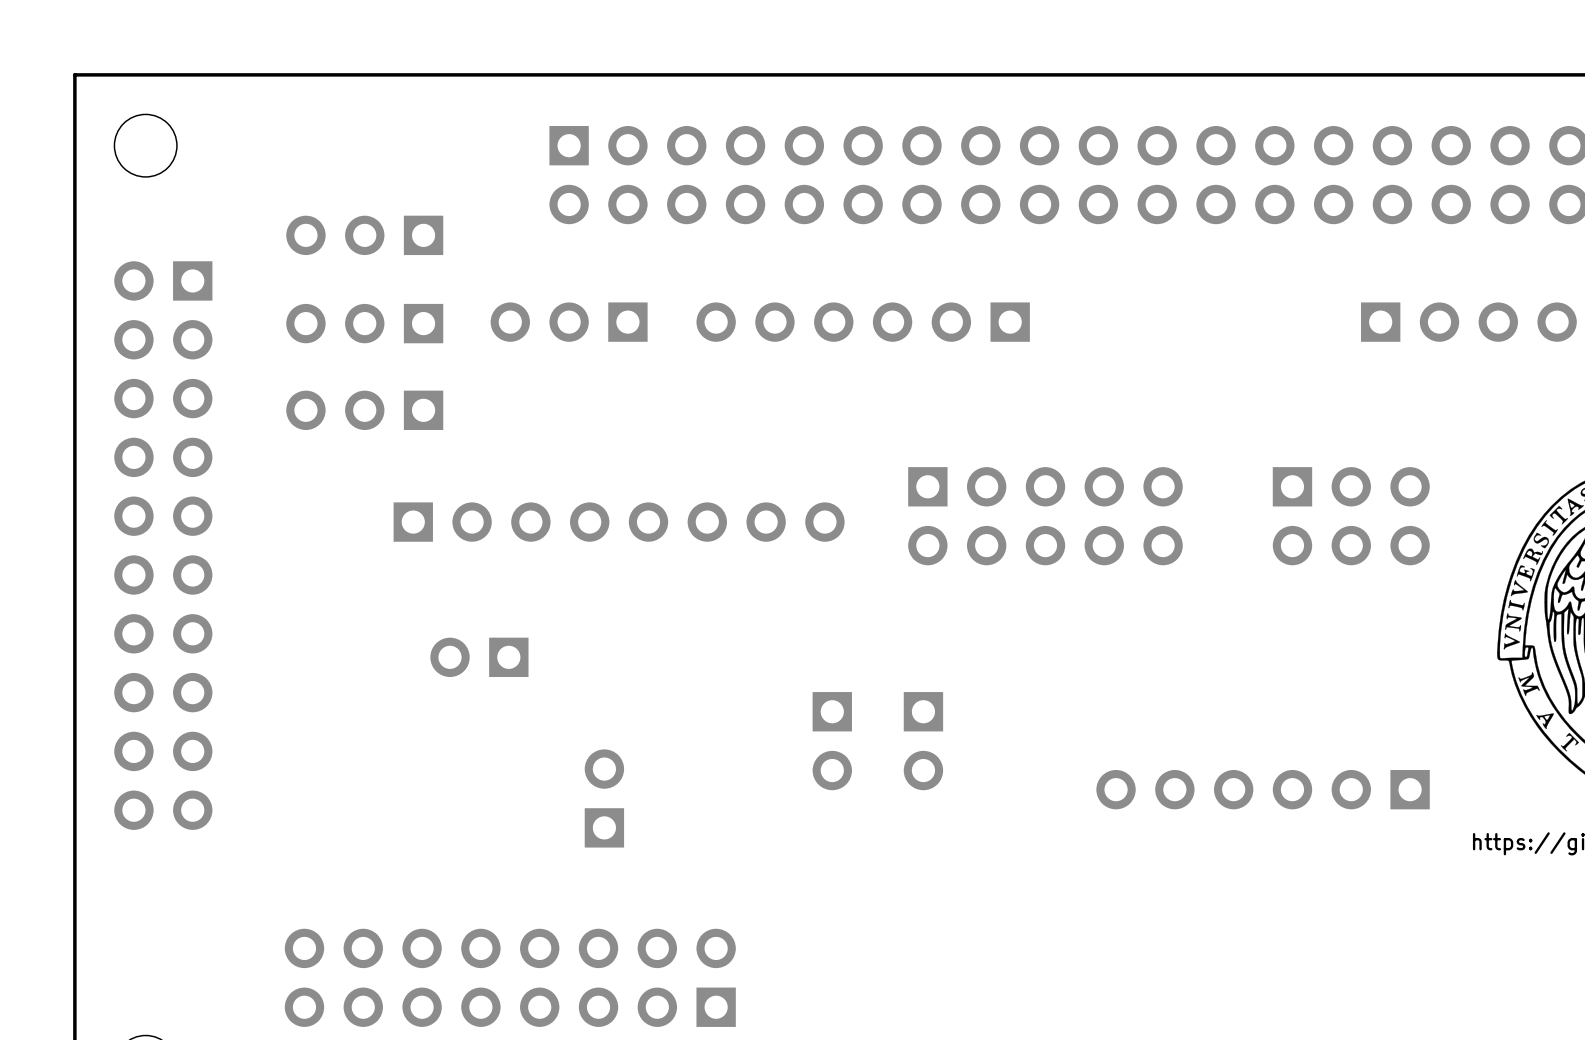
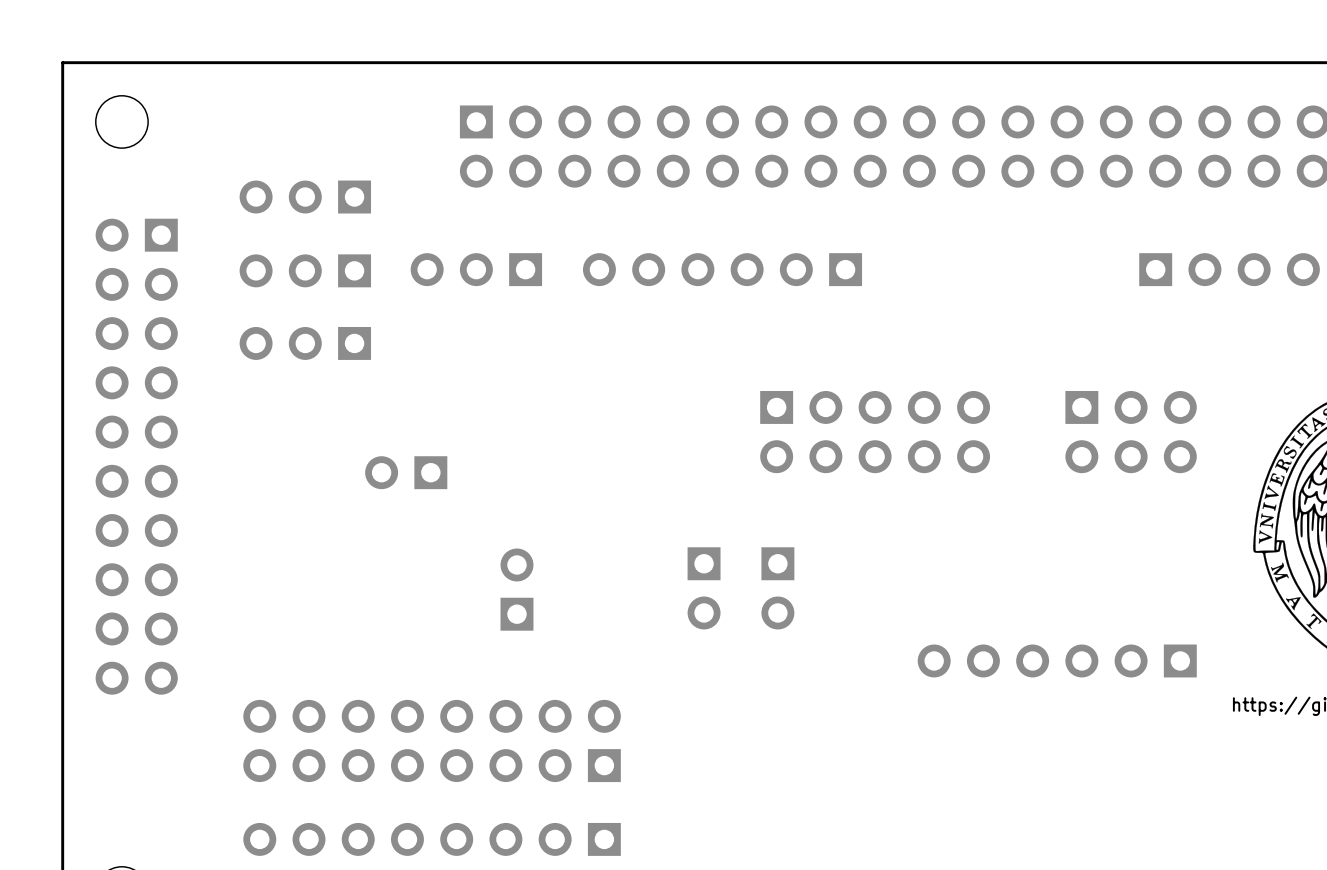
part rotation: 0° (619, 522) -> 180° (432, 839)
part position: (619, 522) -> (432, 839)
part: none -> (406, 472)
part: (479, 657) -> none
part: none -> (516, 589)
part position: (832, 741) -> (704, 588)
part position: (923, 741) -> (777, 588)
part: (604, 798) -> none
part position: (510, 977) -> (432, 740)

